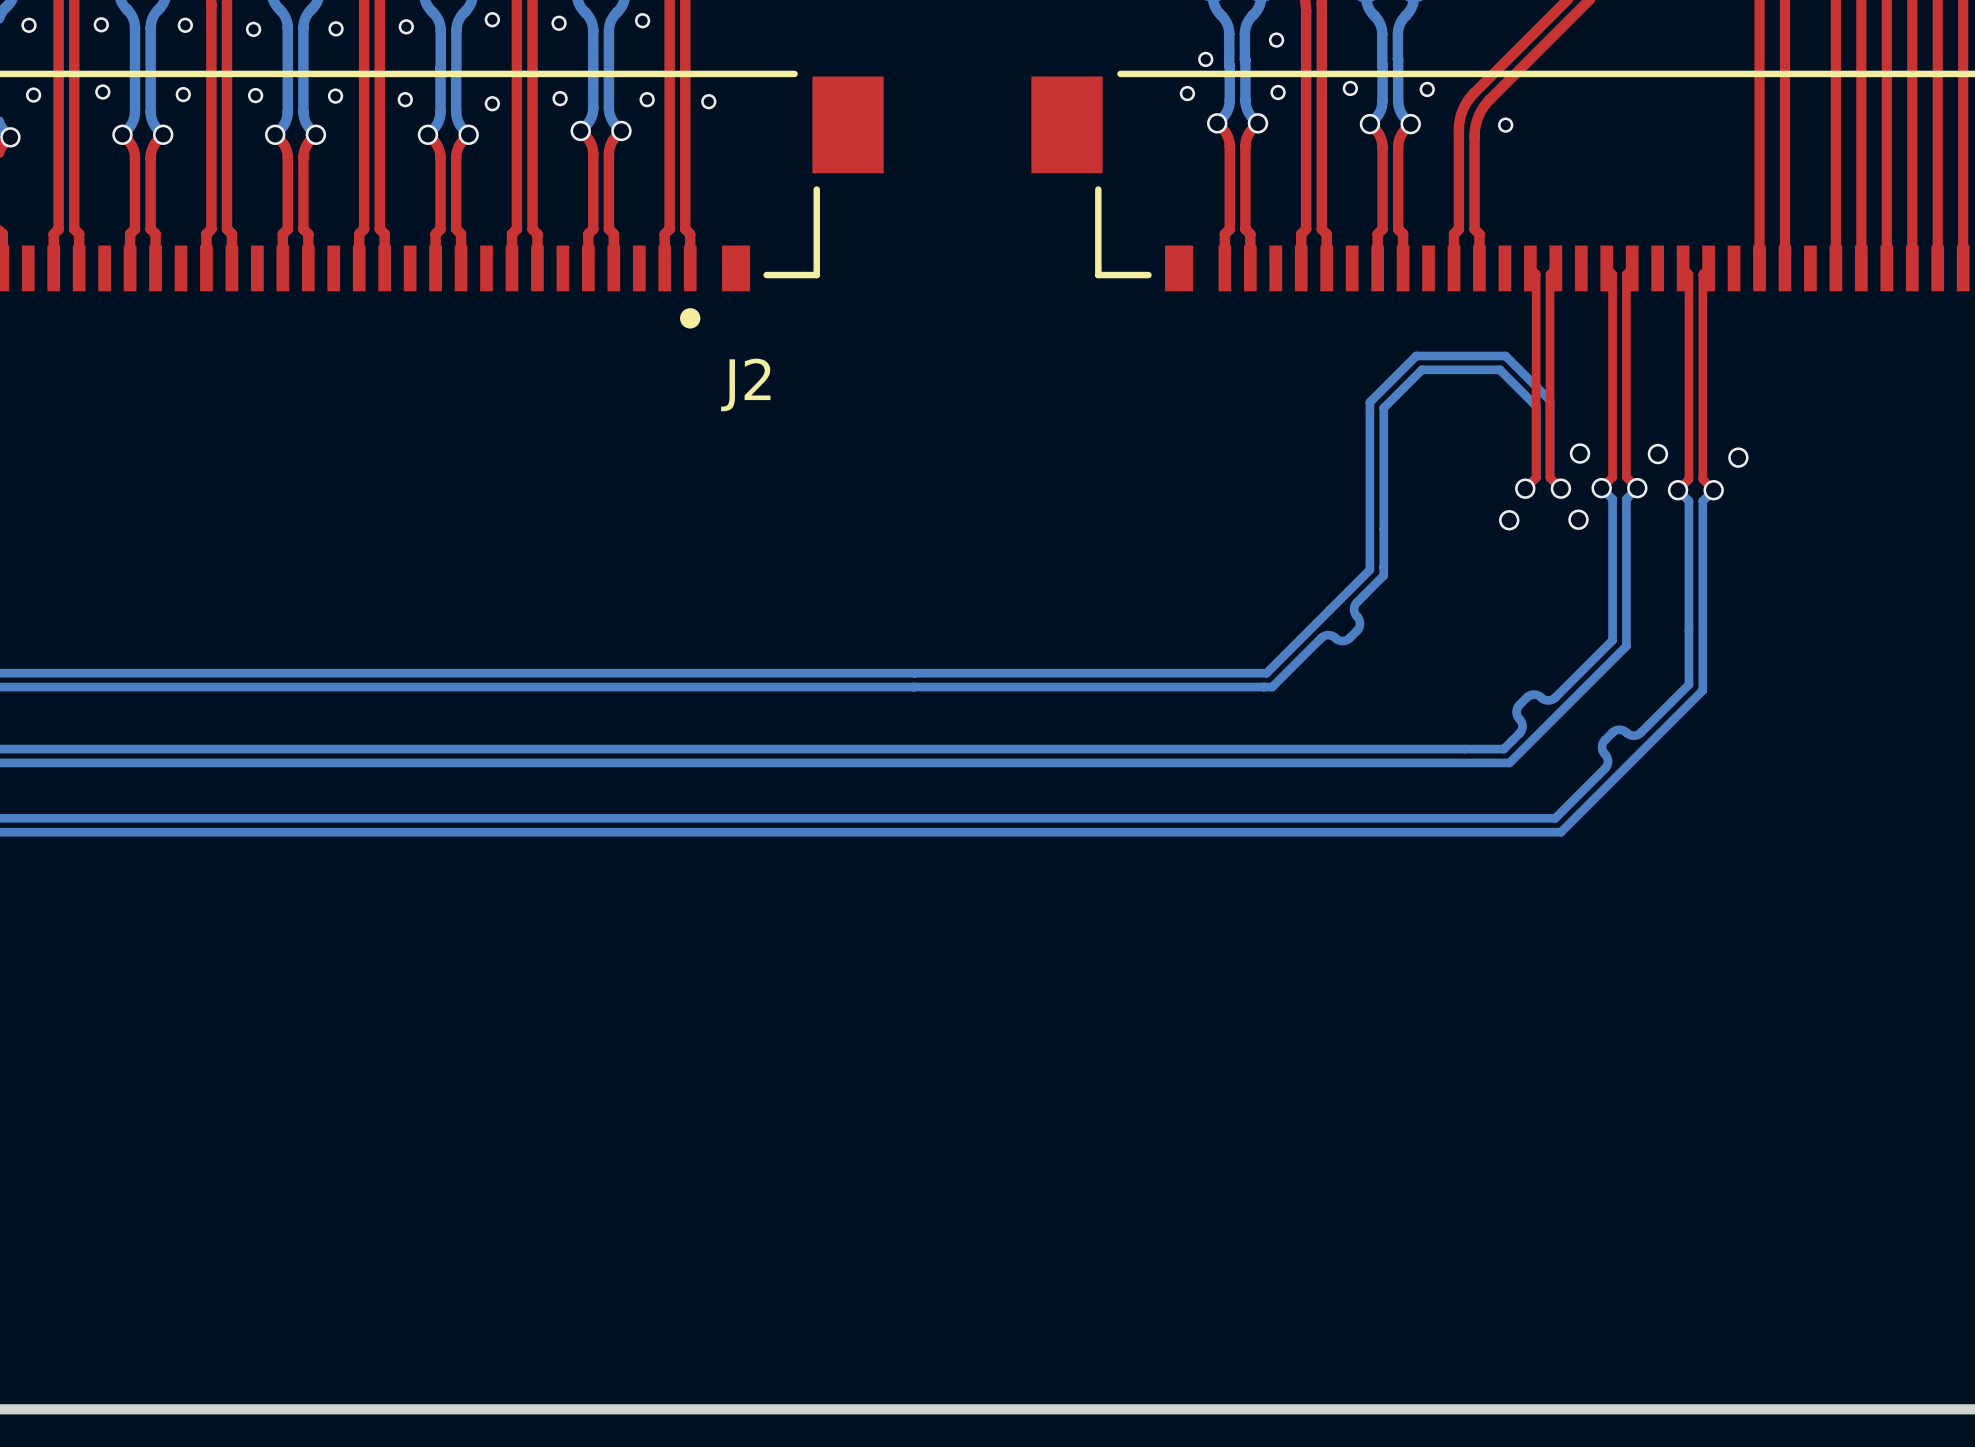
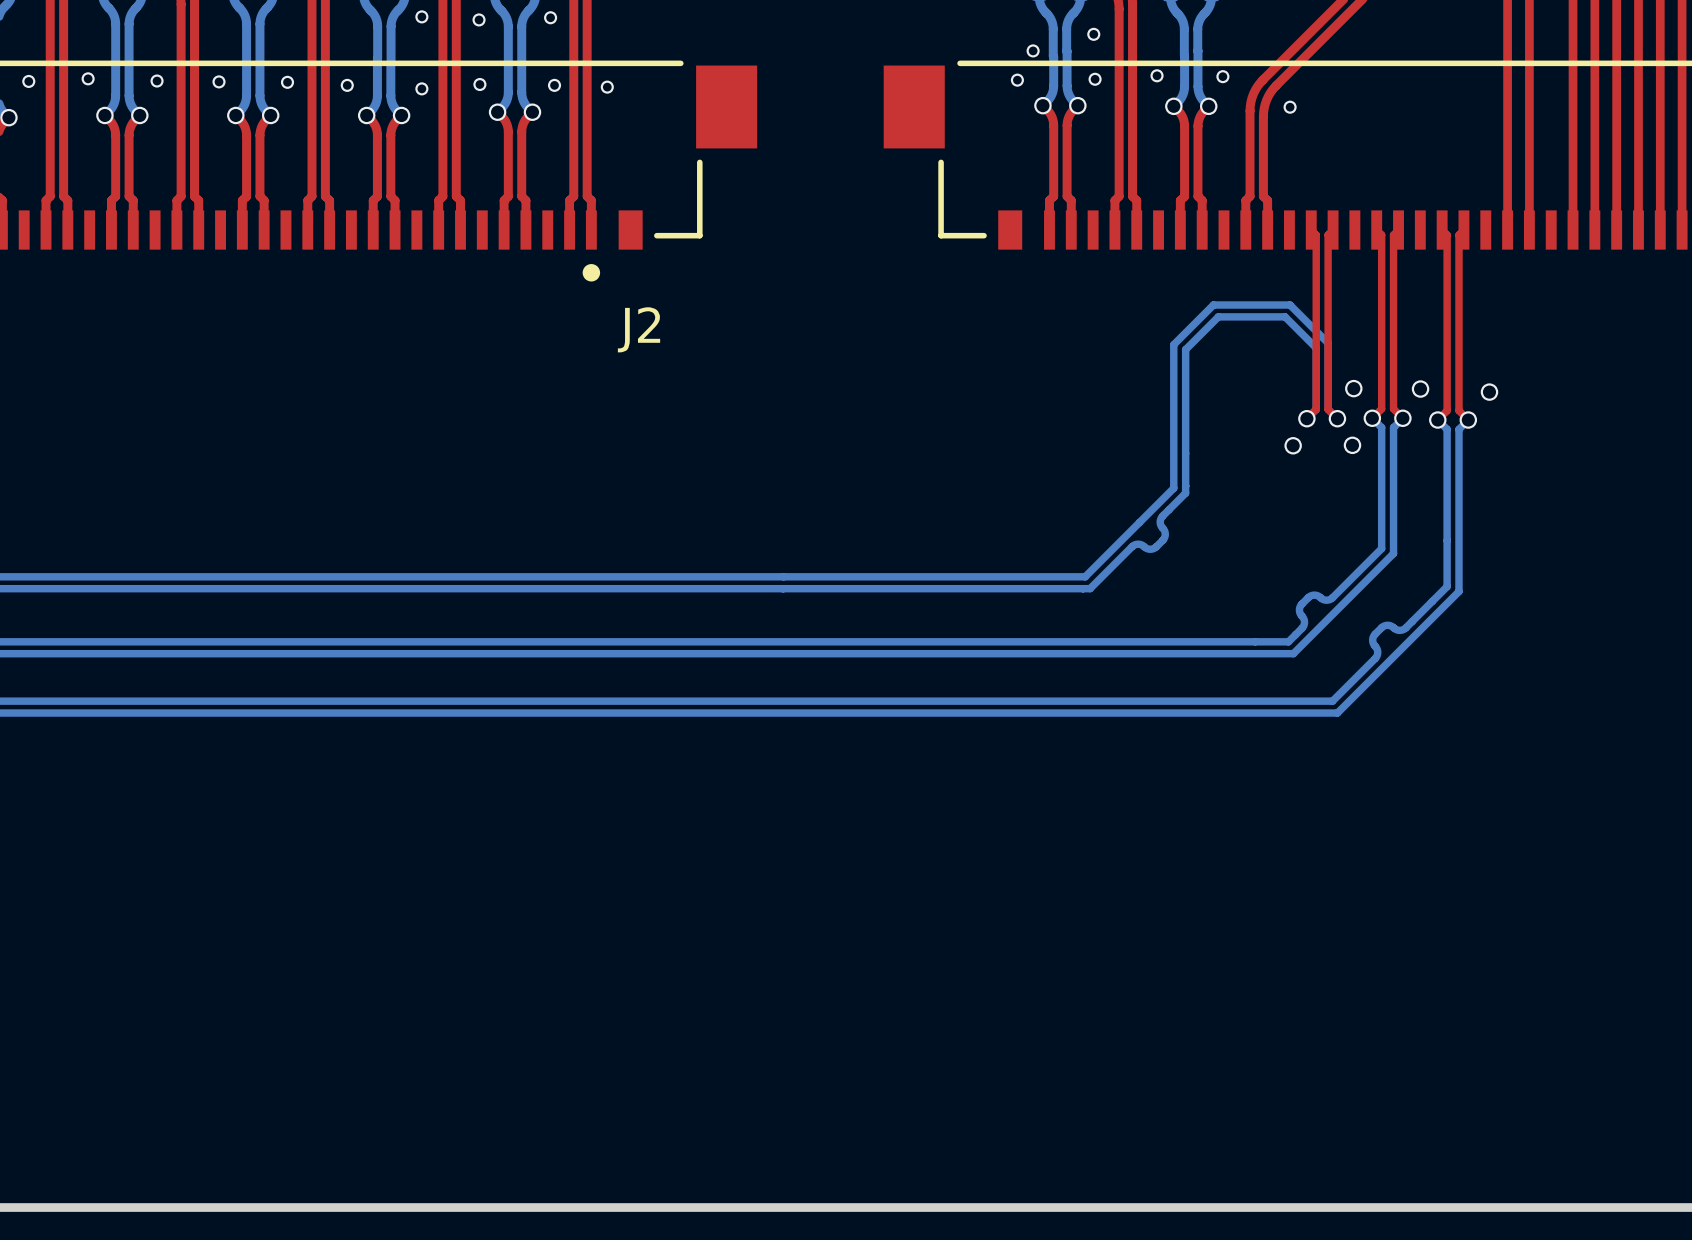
via: (101, 24) -> none
via: (29, 25) -> none
via: (185, 25) -> none
via: (406, 26) -> none
via: (336, 28) -> none
via: (253, 29) -> none

